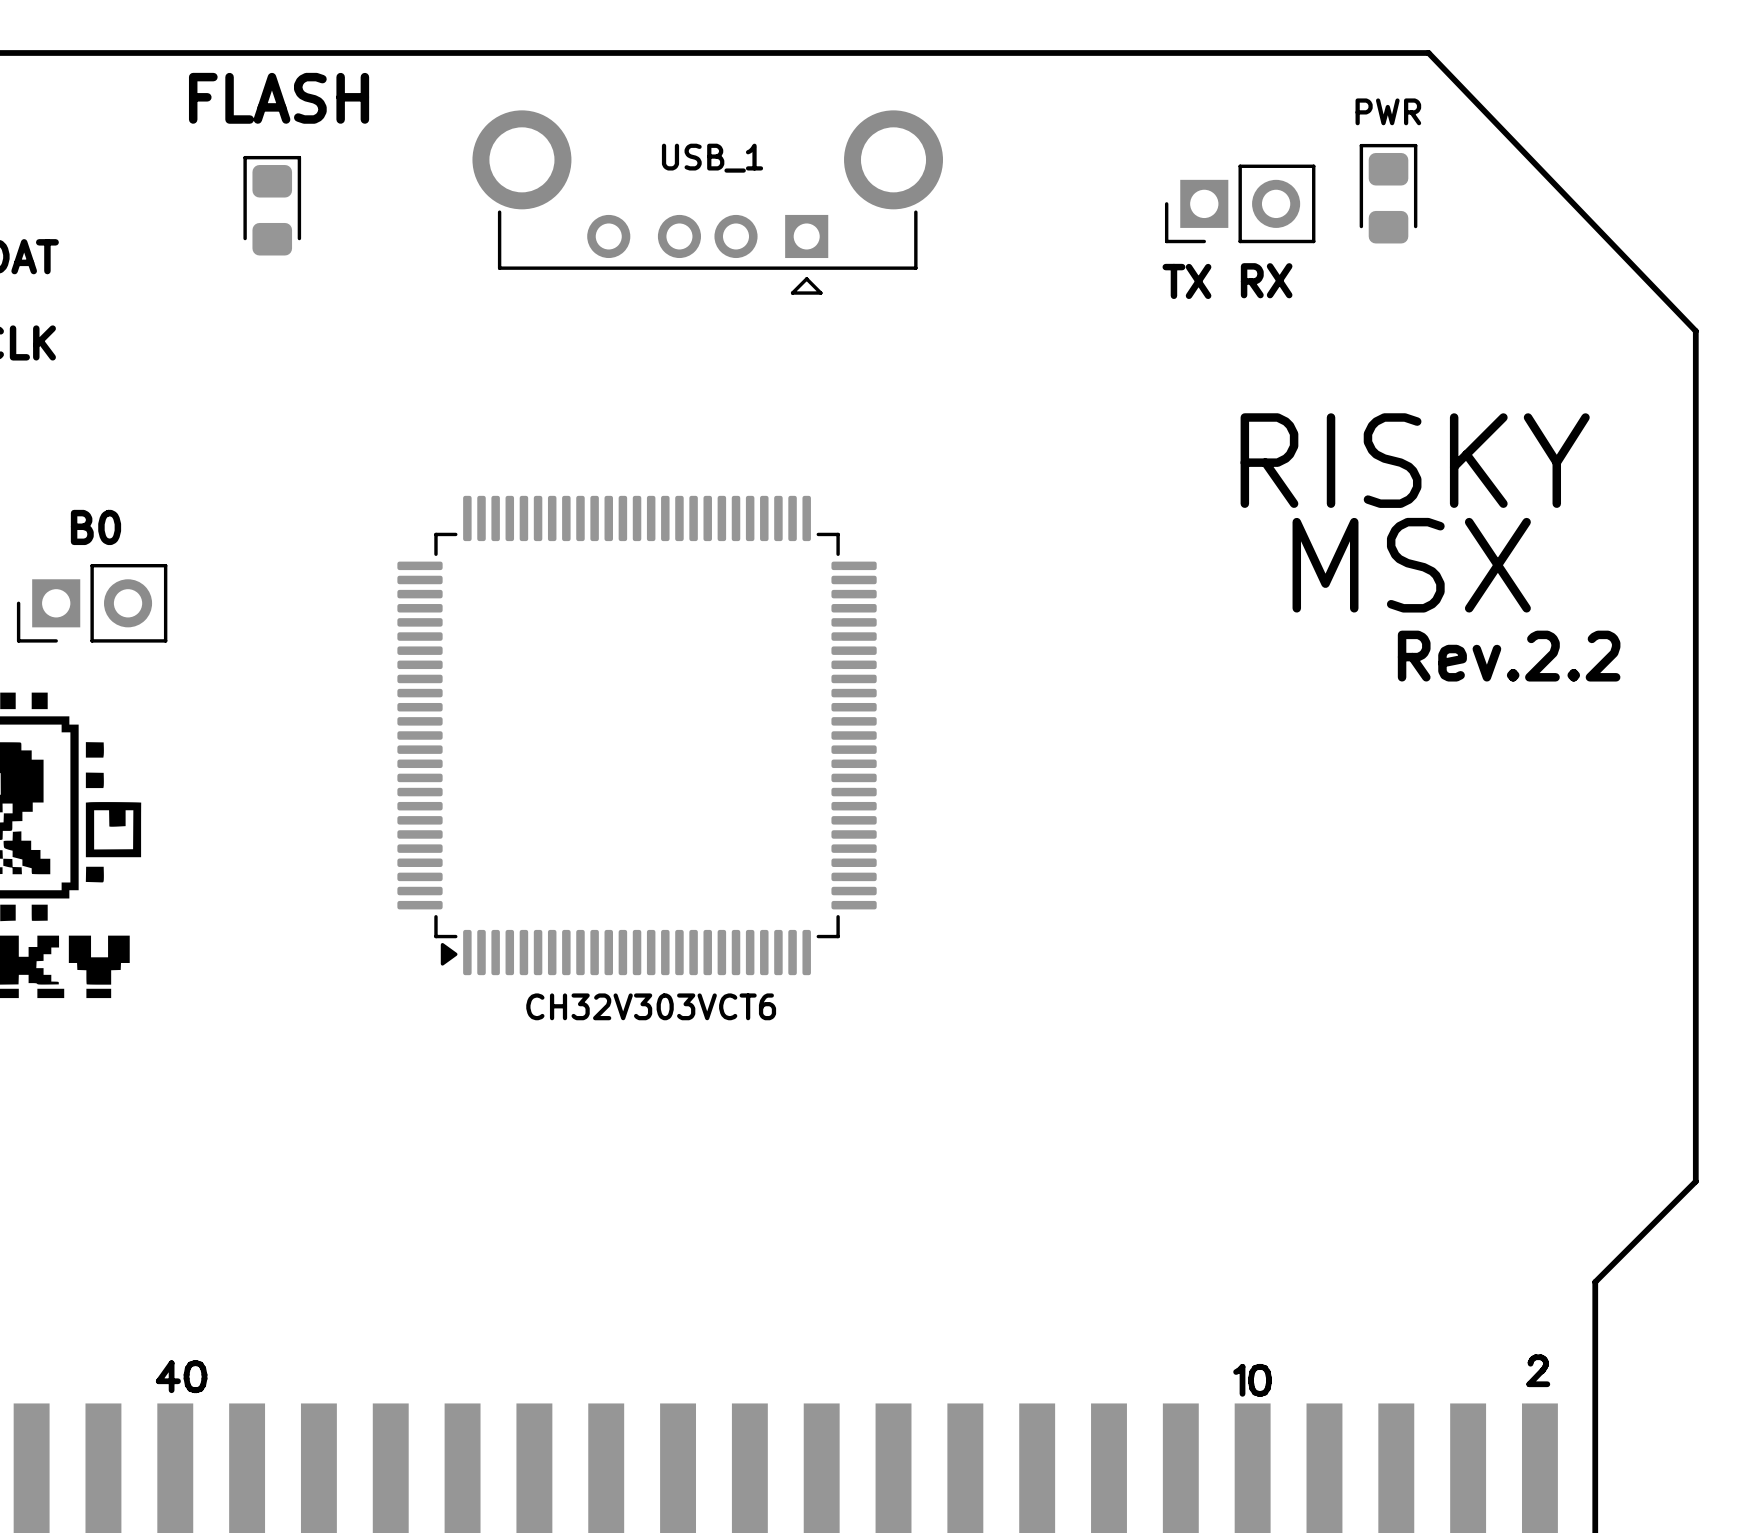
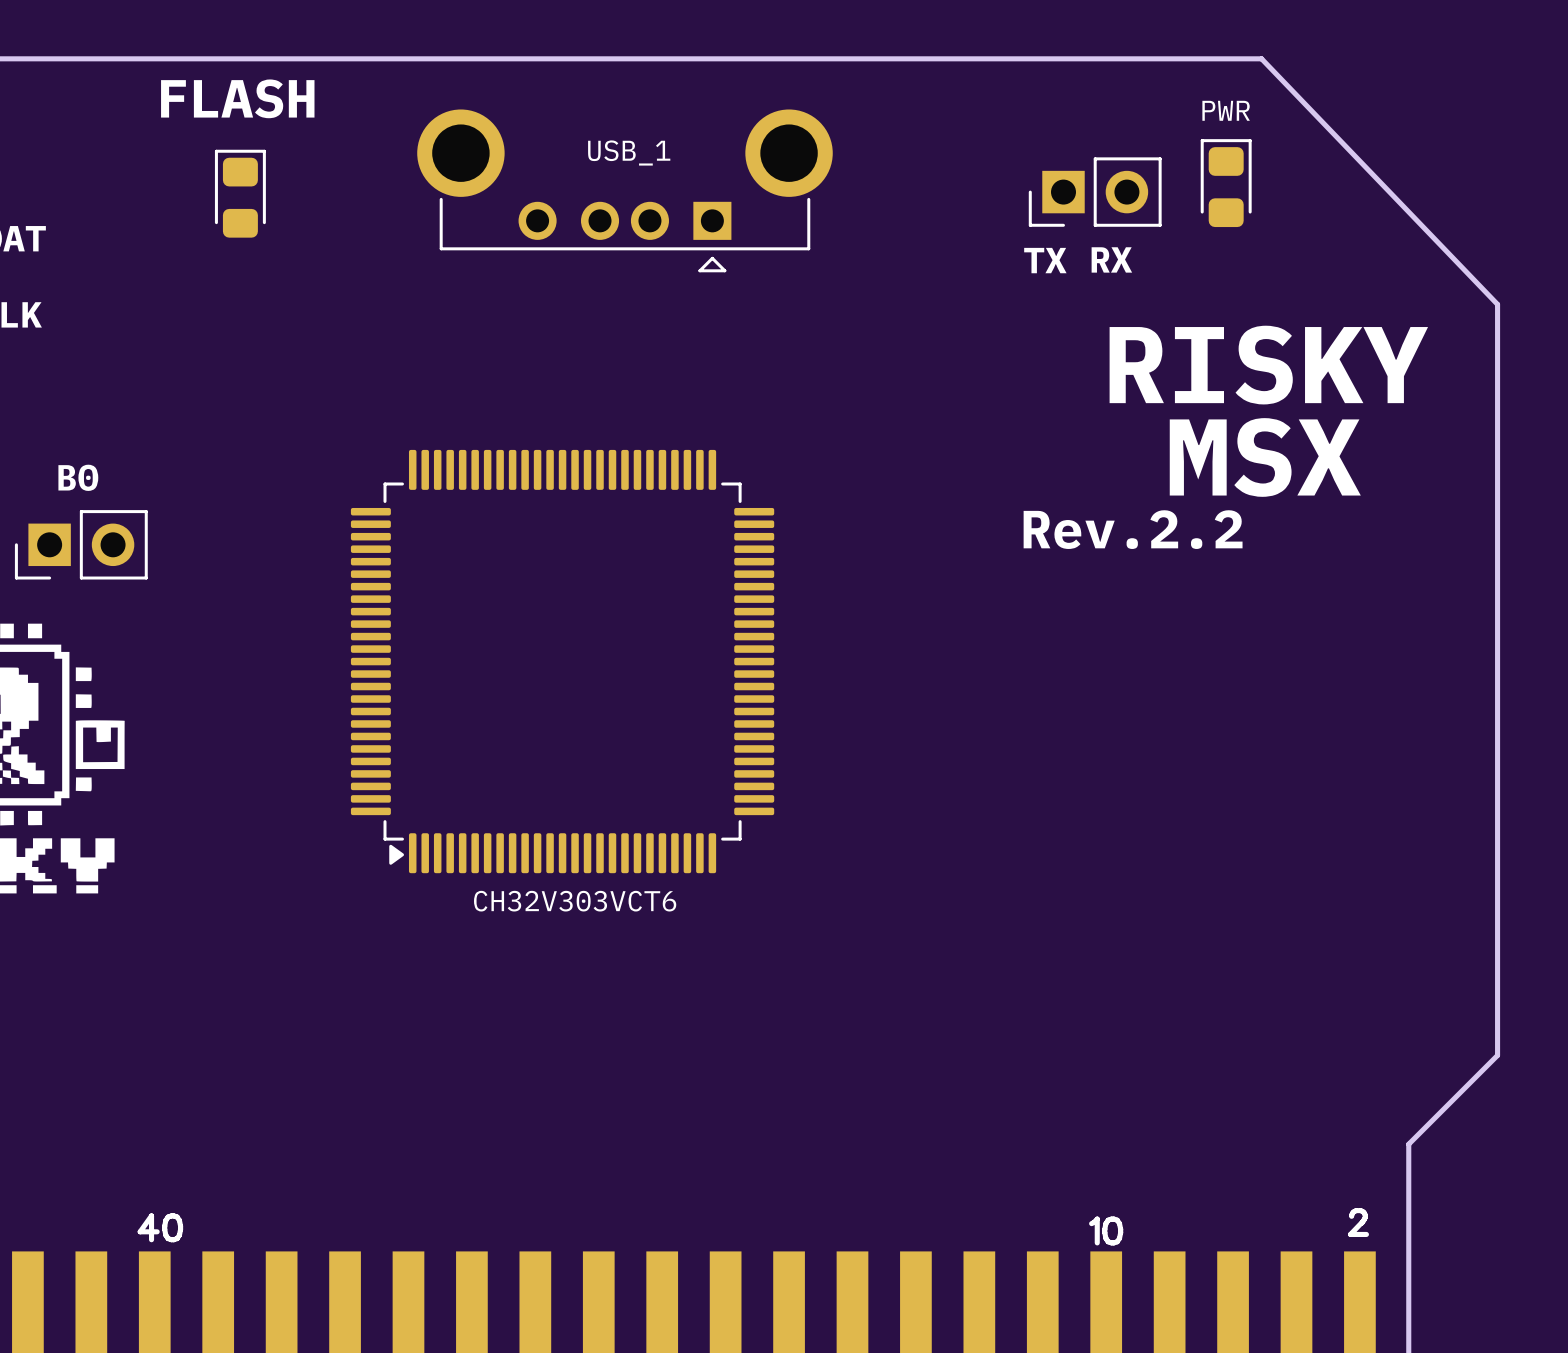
text position: RISKY (1415, 460) -> RISKY (1268, 365)
text position: MSX (1411, 565) -> MSX (1265, 457)
text position: Rev.2.2 (1509, 656) -> Rev.2.2 (1133, 529)

